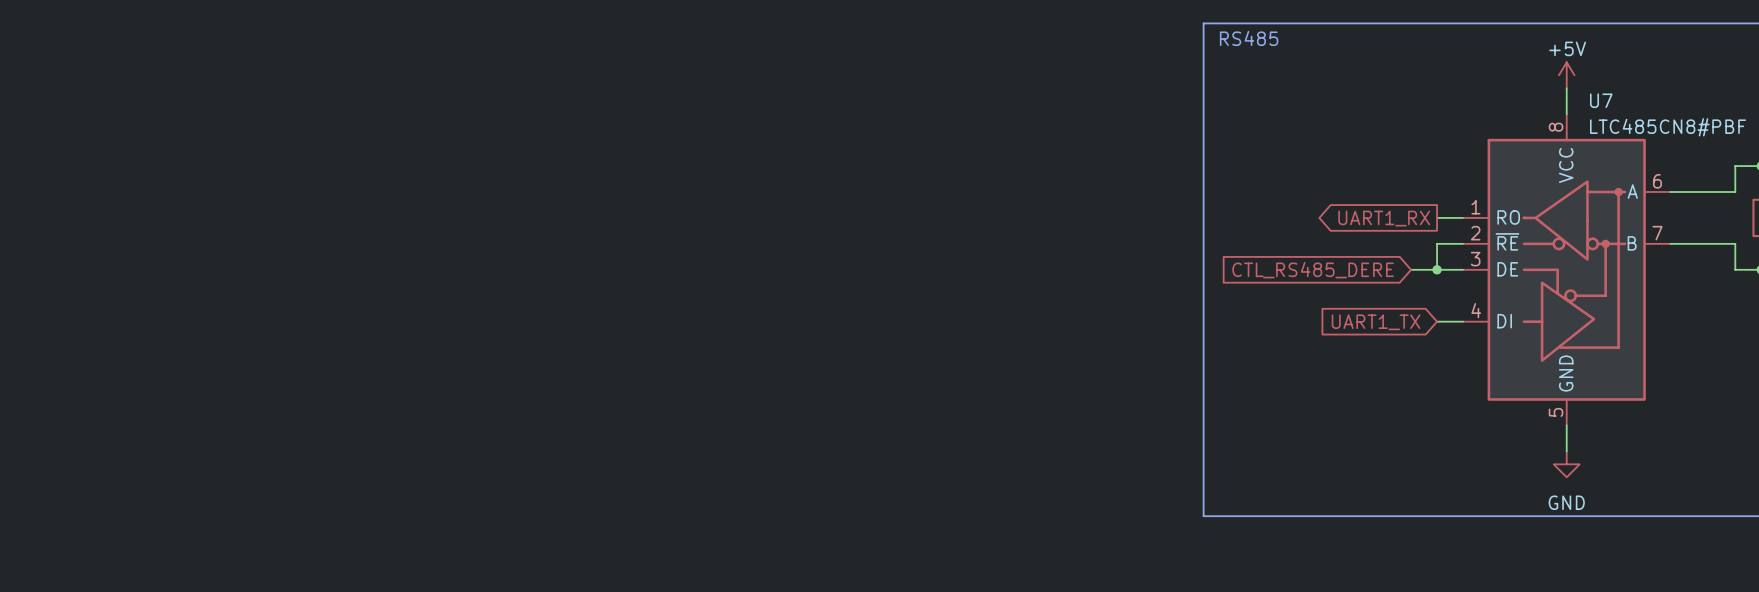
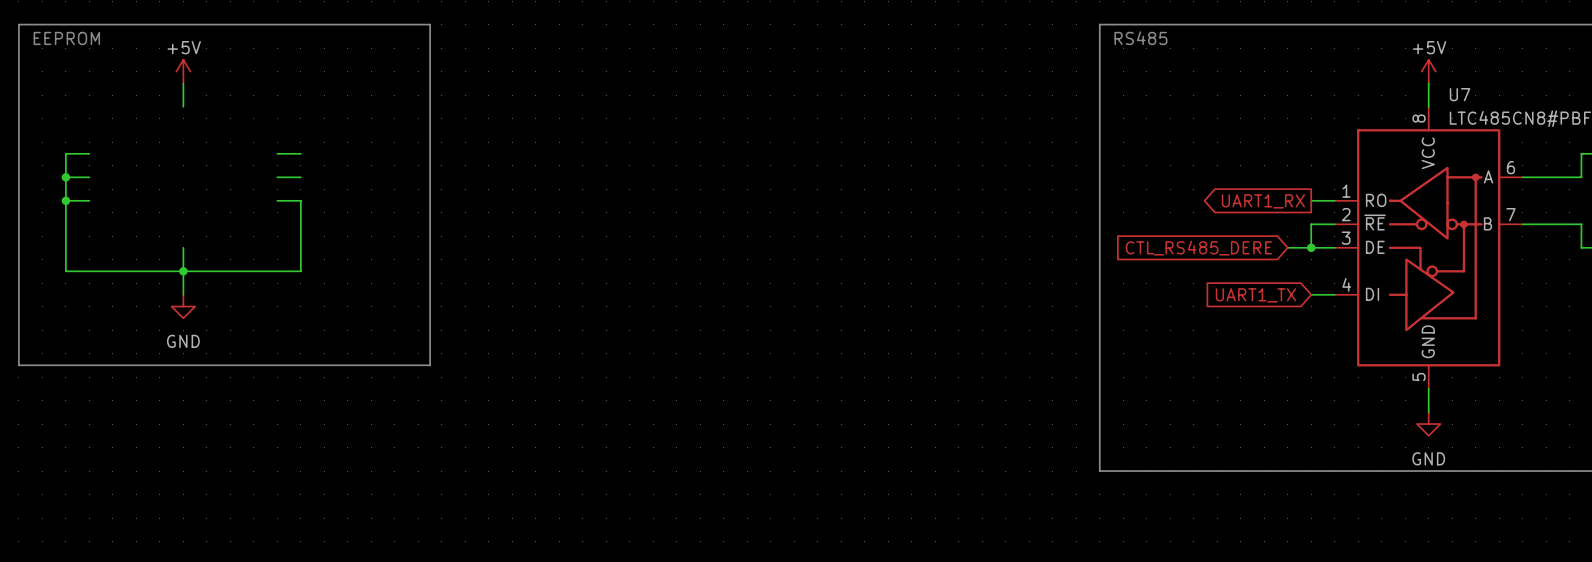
line: none -> (18, 24) (430, 24) (430, 365) (18, 365) (18, 24)
text: none -> EEPROM (66, 38)
power symbol: none -> +5V (183, 71)
wire: none -> (183, 83) (183, 106)
wire: none -> (89, 153) (65, 153) (65, 271) (300, 271) (300, 200) (277, 200)
wire: none -> (277, 153) (300, 153)
wire: none -> (65, 177) (89, 177)
junction: none -> (65, 177)
wire: none -> (277, 177) (300, 177)
wire: none -> (65, 200) (89, 200)
junction: none -> (65, 200)
wire: none -> (183, 247) (183, 294)
junction: none -> (183, 271)
power symbol: none -> GND (183, 306)

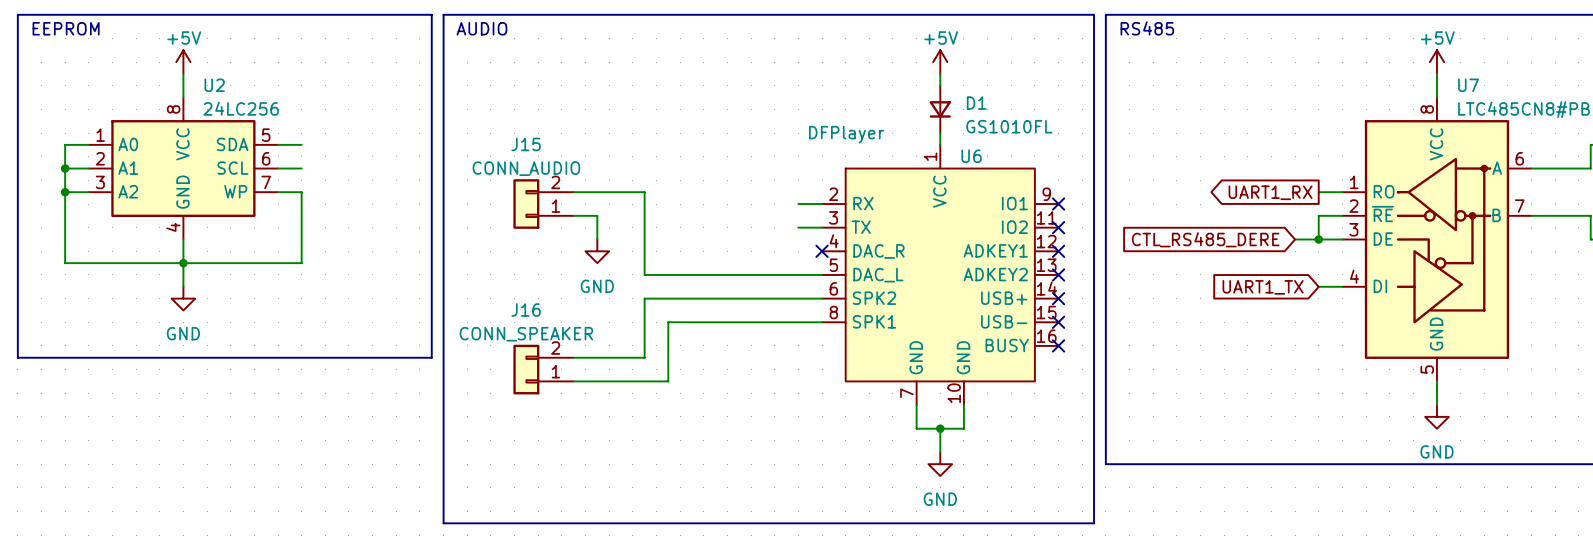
line: none -> (443, 14) (1094, 14) (1094, 523) (443, 523) (443, 14)
text: none -> AUDIO (481, 28)
power symbol: none -> +5V (940, 62)
wire: none -> (940, 73) (940, 85)
D1: none -> GS1010FL (940, 109)
wire: none -> (940, 133) (940, 144)
U2: none -> 24LC256 (183, 168)
wire: none -> (573, 192) (644, 192) (644, 274) (822, 274)
J15: none -> CONN_AUDIO (543, 204)
wire: none -> (798, 204) (822, 204)
no-connect mark: none -> (1058, 204)
wire: none -> (573, 215) (597, 215) (597, 239)
wire: none -> (798, 227) (822, 227)
no-connect mark: none -> (1058, 227)
power symbol: none -> GND (597, 251)
no-connect mark: none -> (822, 251)
no-connect mark: none -> (1058, 251)
U6: none -> DFPlayer (940, 274)
no-connect mark: none -> (1058, 274)
wire: none -> (822, 298) (644, 298) (644, 357) (573, 357)
no-connect mark: none -> (1058, 298)
wire: none -> (822, 322) (668, 322) (668, 381) (573, 381)
no-connect mark: none -> (1058, 322)
no-connect mark: none -> (1058, 345)
J16: none -> CONN_SPEAKER (543, 369)
wire: none -> (916, 405) (916, 428) (963, 428) (963, 405)
wire: none -> (940, 428) (940, 452)
junction: none -> (940, 428)
power symbol: none -> GND (940, 464)

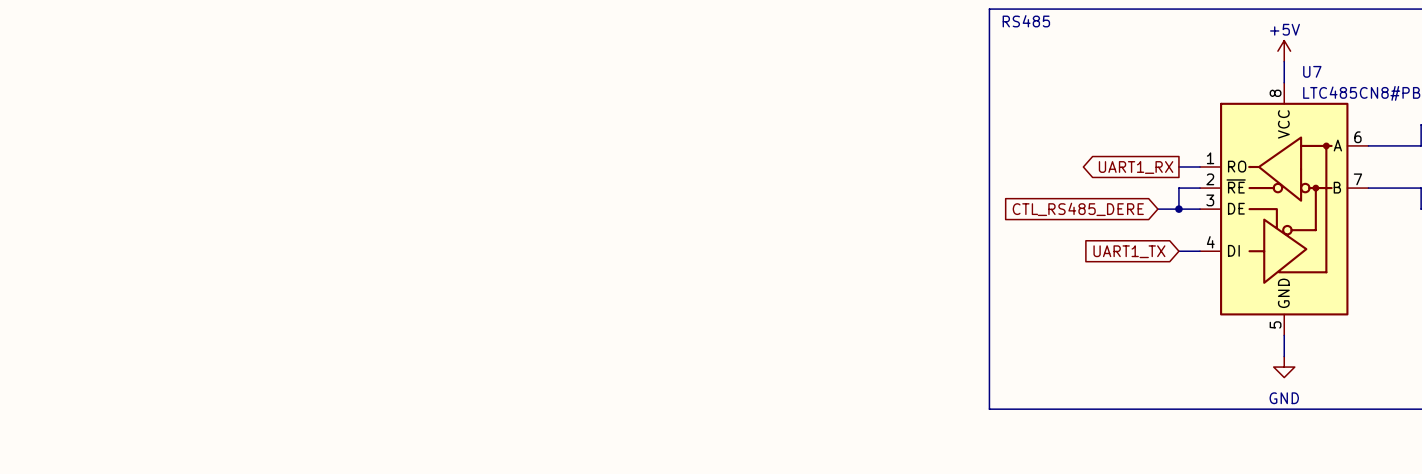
line: (17, 14) (431, 14) (431, 357) (17, 357) (17, 14) -> none
line: (443, 14) (1094, 14) (1094, 523) (443, 523) (443, 14) -> none
text: EEPROM (66, 28) -> none
text: AUDIO (481, 28) -> none
power symbol: +5V (183, 62) -> none
power symbol: +5V (940, 62) -> none
wire: (183, 73) (183, 97) -> none
wire: (940, 73) (940, 85) -> none
D1: GS1010FL (940, 109) -> none
wire: (940, 133) (940, 144) -> none
wire: (88, 144) (65, 144) (65, 263) (301, 263) (301, 192) (278, 192) -> none
wire: (278, 144) (301, 144) -> none
wire: (65, 168) (88, 168) -> none
junction: (65, 168) -> none
U2: 24LC256 (183, 168) -> none
wire: (278, 168) (301, 168) -> none
wire: (65, 192) (88, 192) -> none
junction: (65, 192) -> none
wire: (573, 192) (644, 192) (644, 274) (822, 274) -> none
J15: CONN_AUDIO (543, 204) -> none
wire: (798, 204) (822, 204) -> none
no-connect mark: (1058, 204) -> none
wire: (573, 215) (597, 215) (597, 239) -> none
wire: (798, 227) (822, 227) -> none
no-connect mark: (1058, 227) -> none
wire: (183, 239) (183, 286) -> none
power symbol: GND (597, 251) -> none
no-connect mark: (822, 251) -> none
no-connect mark: (1058, 251) -> none
junction: (183, 263) -> none
U6: DFPlayer (940, 274) -> none
no-connect mark: (1058, 274) -> none
power symbol: GND (183, 298) -> none
wire: (822, 298) (644, 298) (644, 357) (573, 357) -> none
no-connect mark: (1058, 298) -> none
wire: (822, 322) (668, 322) (668, 381) (573, 381) -> none
no-connect mark: (1058, 322) -> none
no-connect mark: (1058, 345) -> none
J16: CONN_SPEAKER (543, 369) -> none
wire: (916, 405) (916, 428) (963, 428) (963, 405) -> none
wire: (940, 428) (940, 452) -> none
junction: (940, 428) -> none
power symbol: GND (940, 464) -> none

